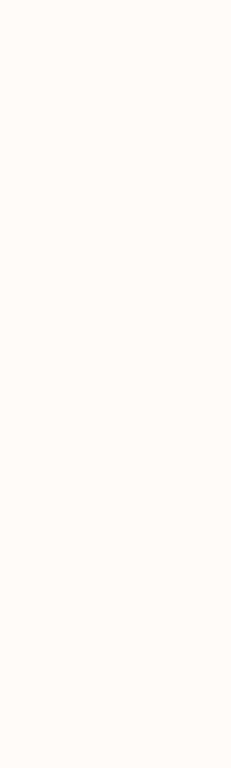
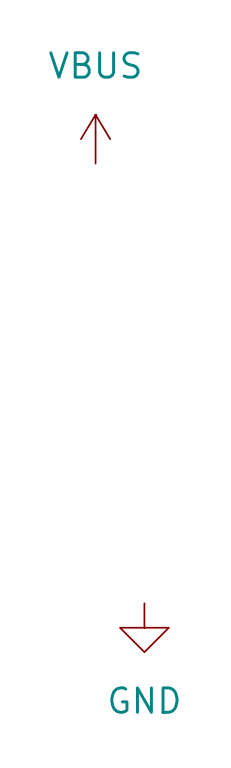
power symbol: none -> VBUS (95, 139)
power symbol: none -> GND (144, 627)

